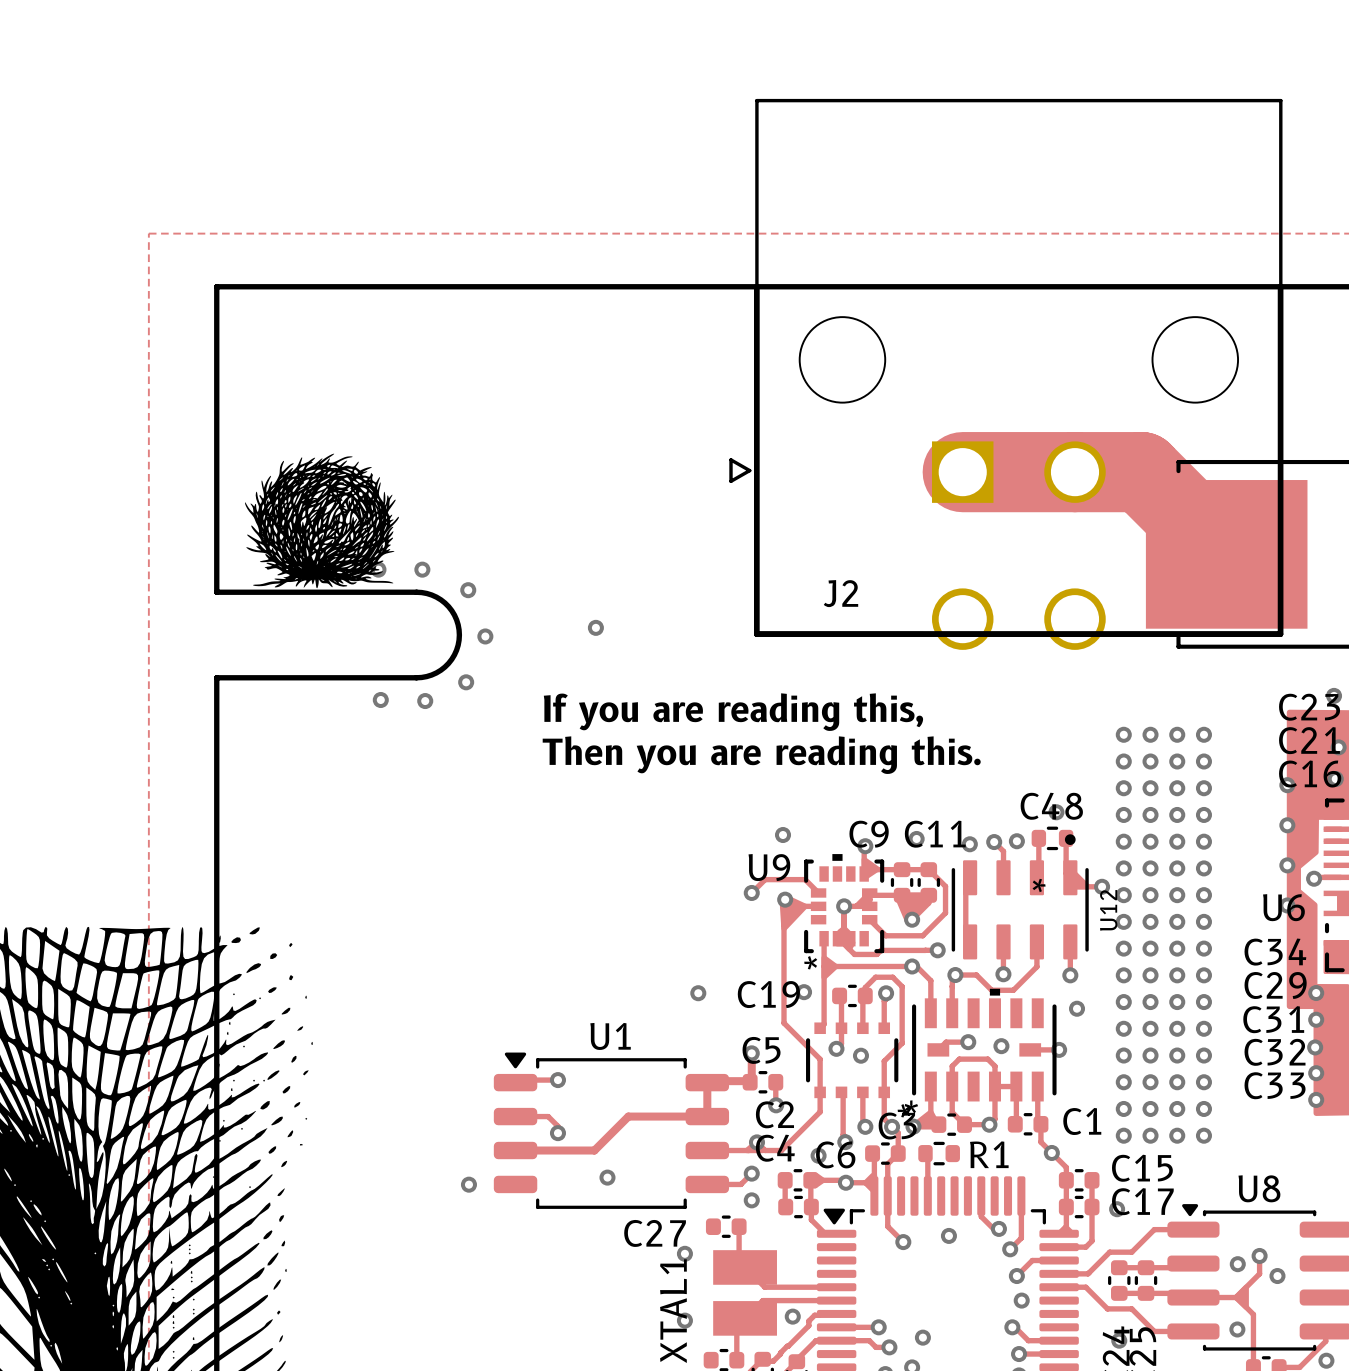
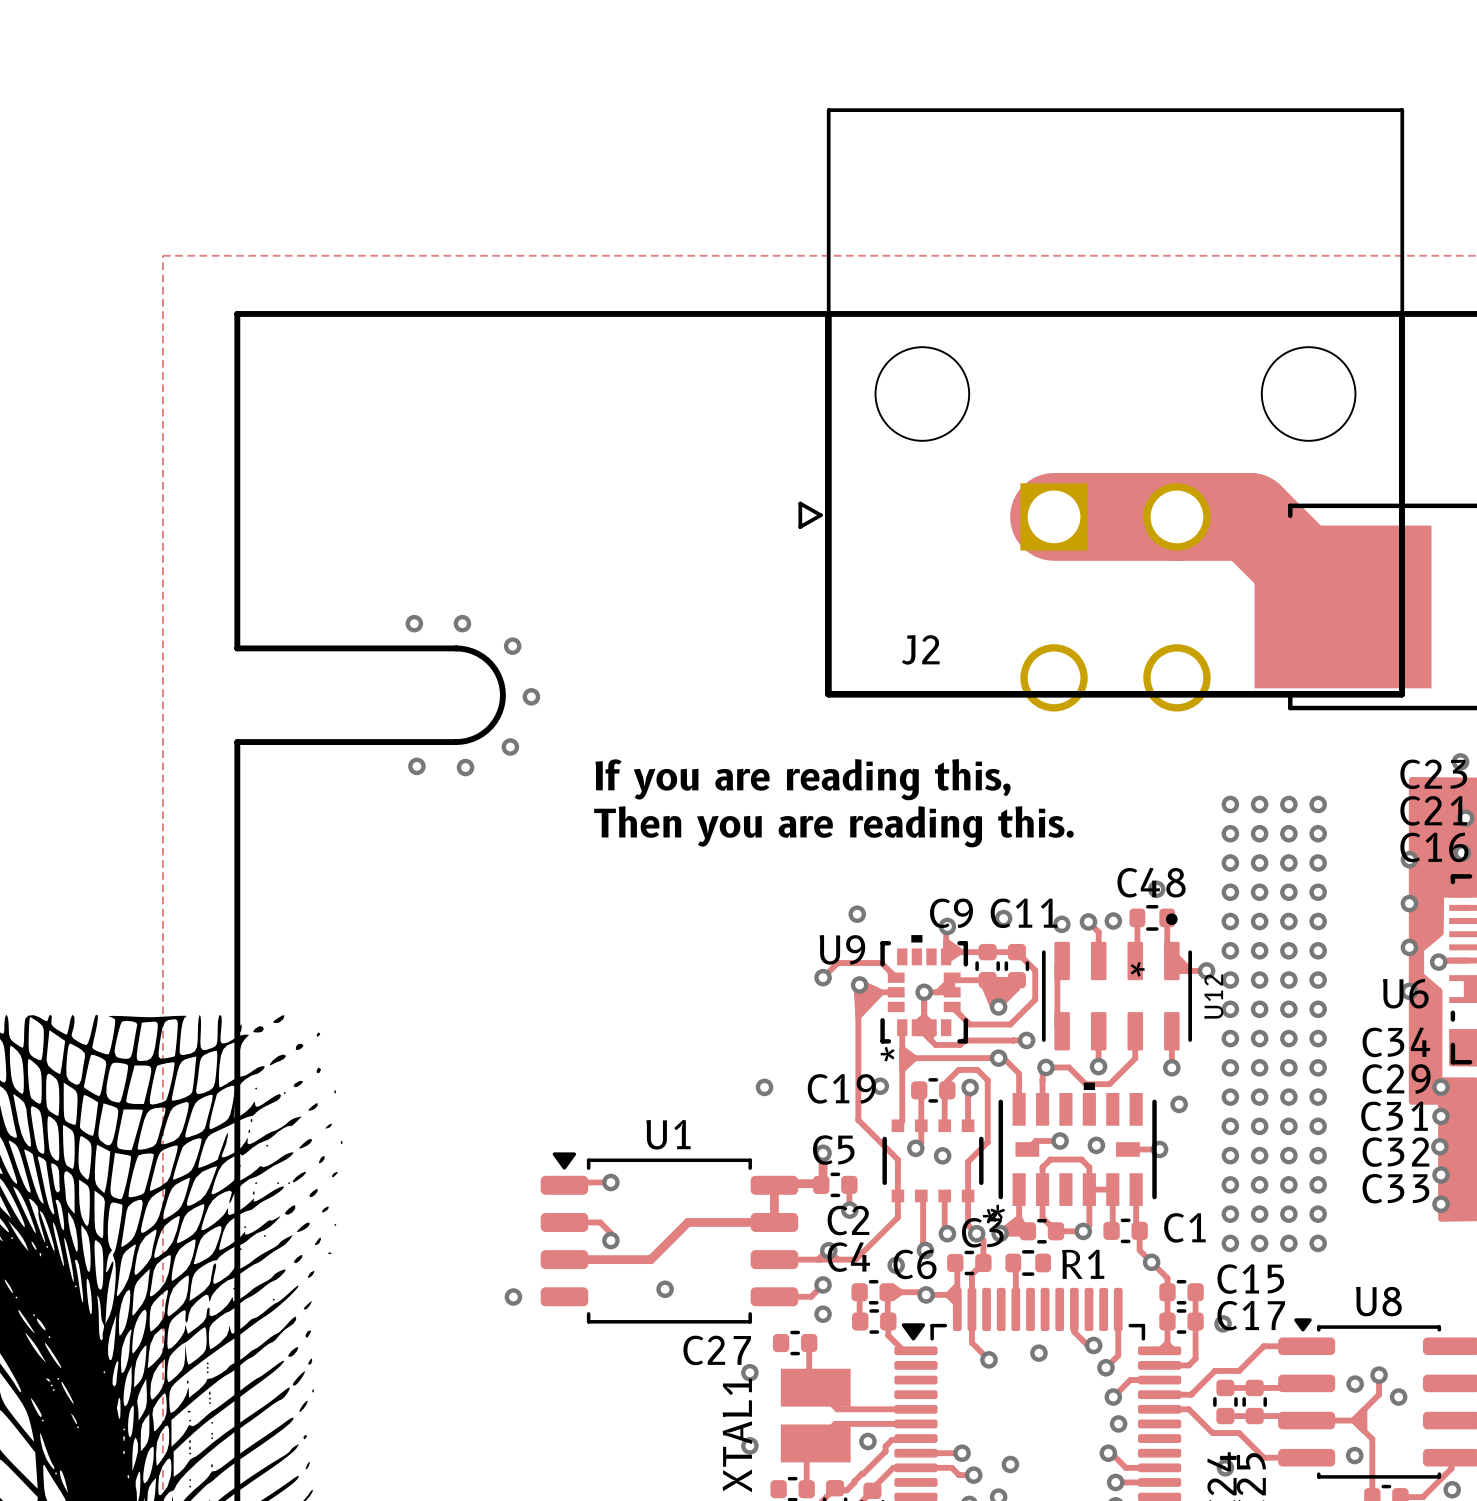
drawing: [244, 453, 399, 589] -> none
via: (595, 627) -> none

